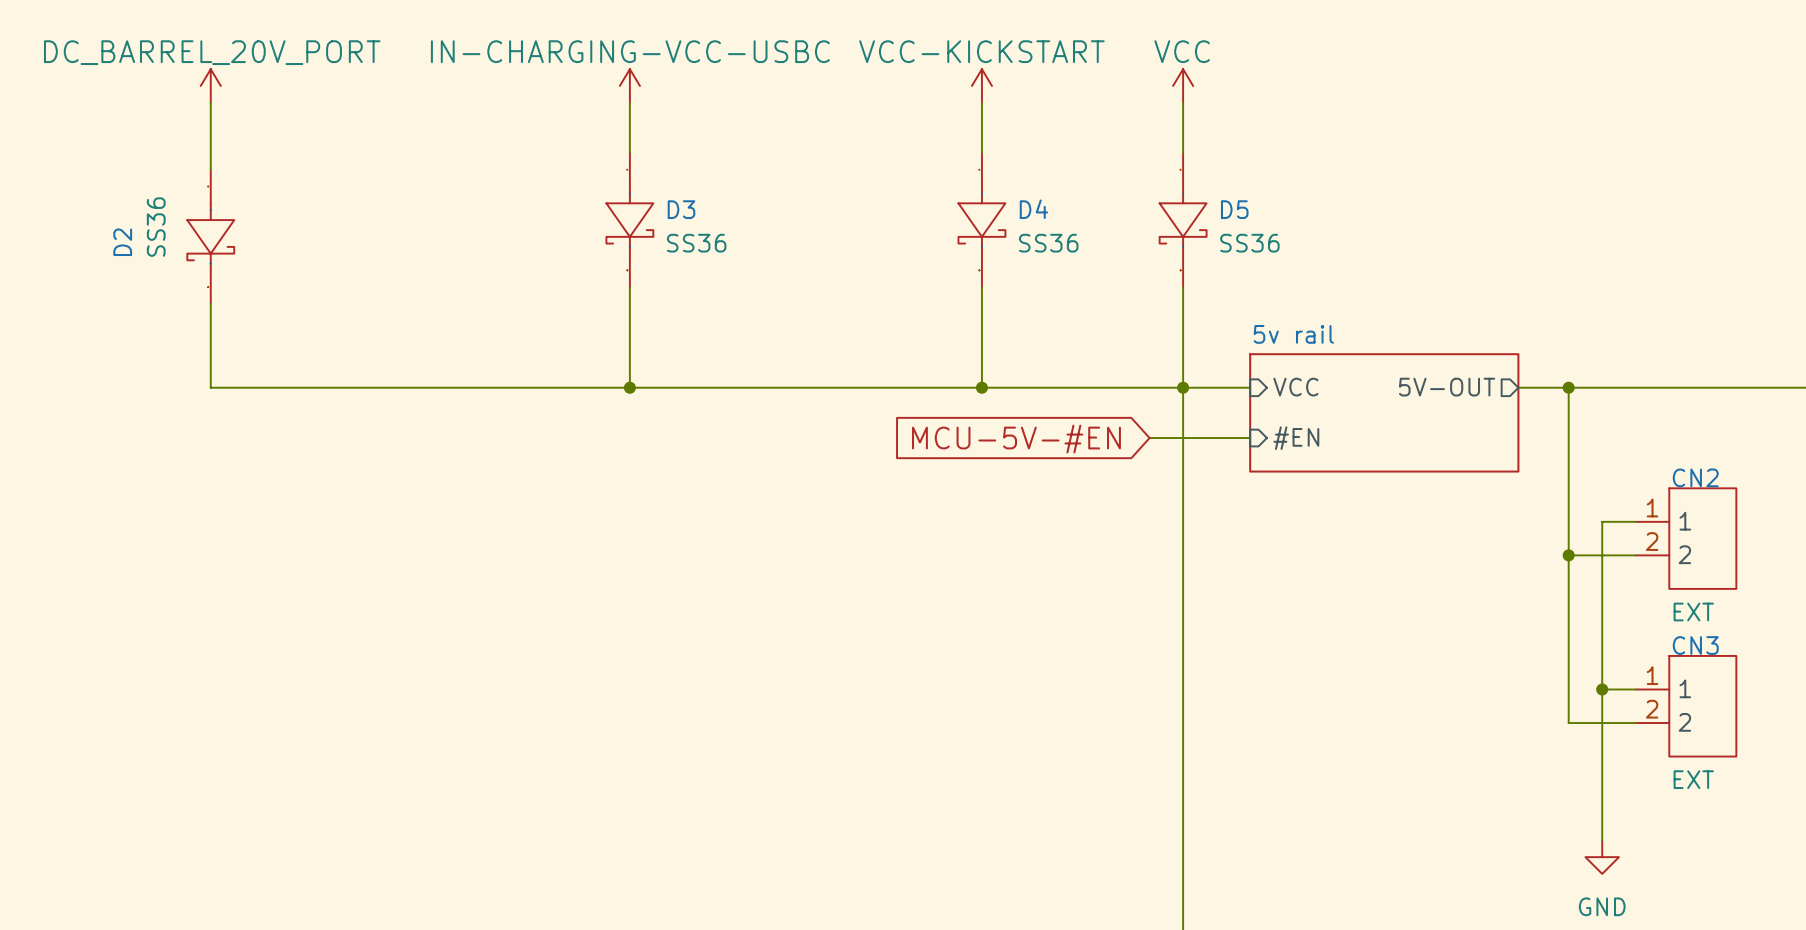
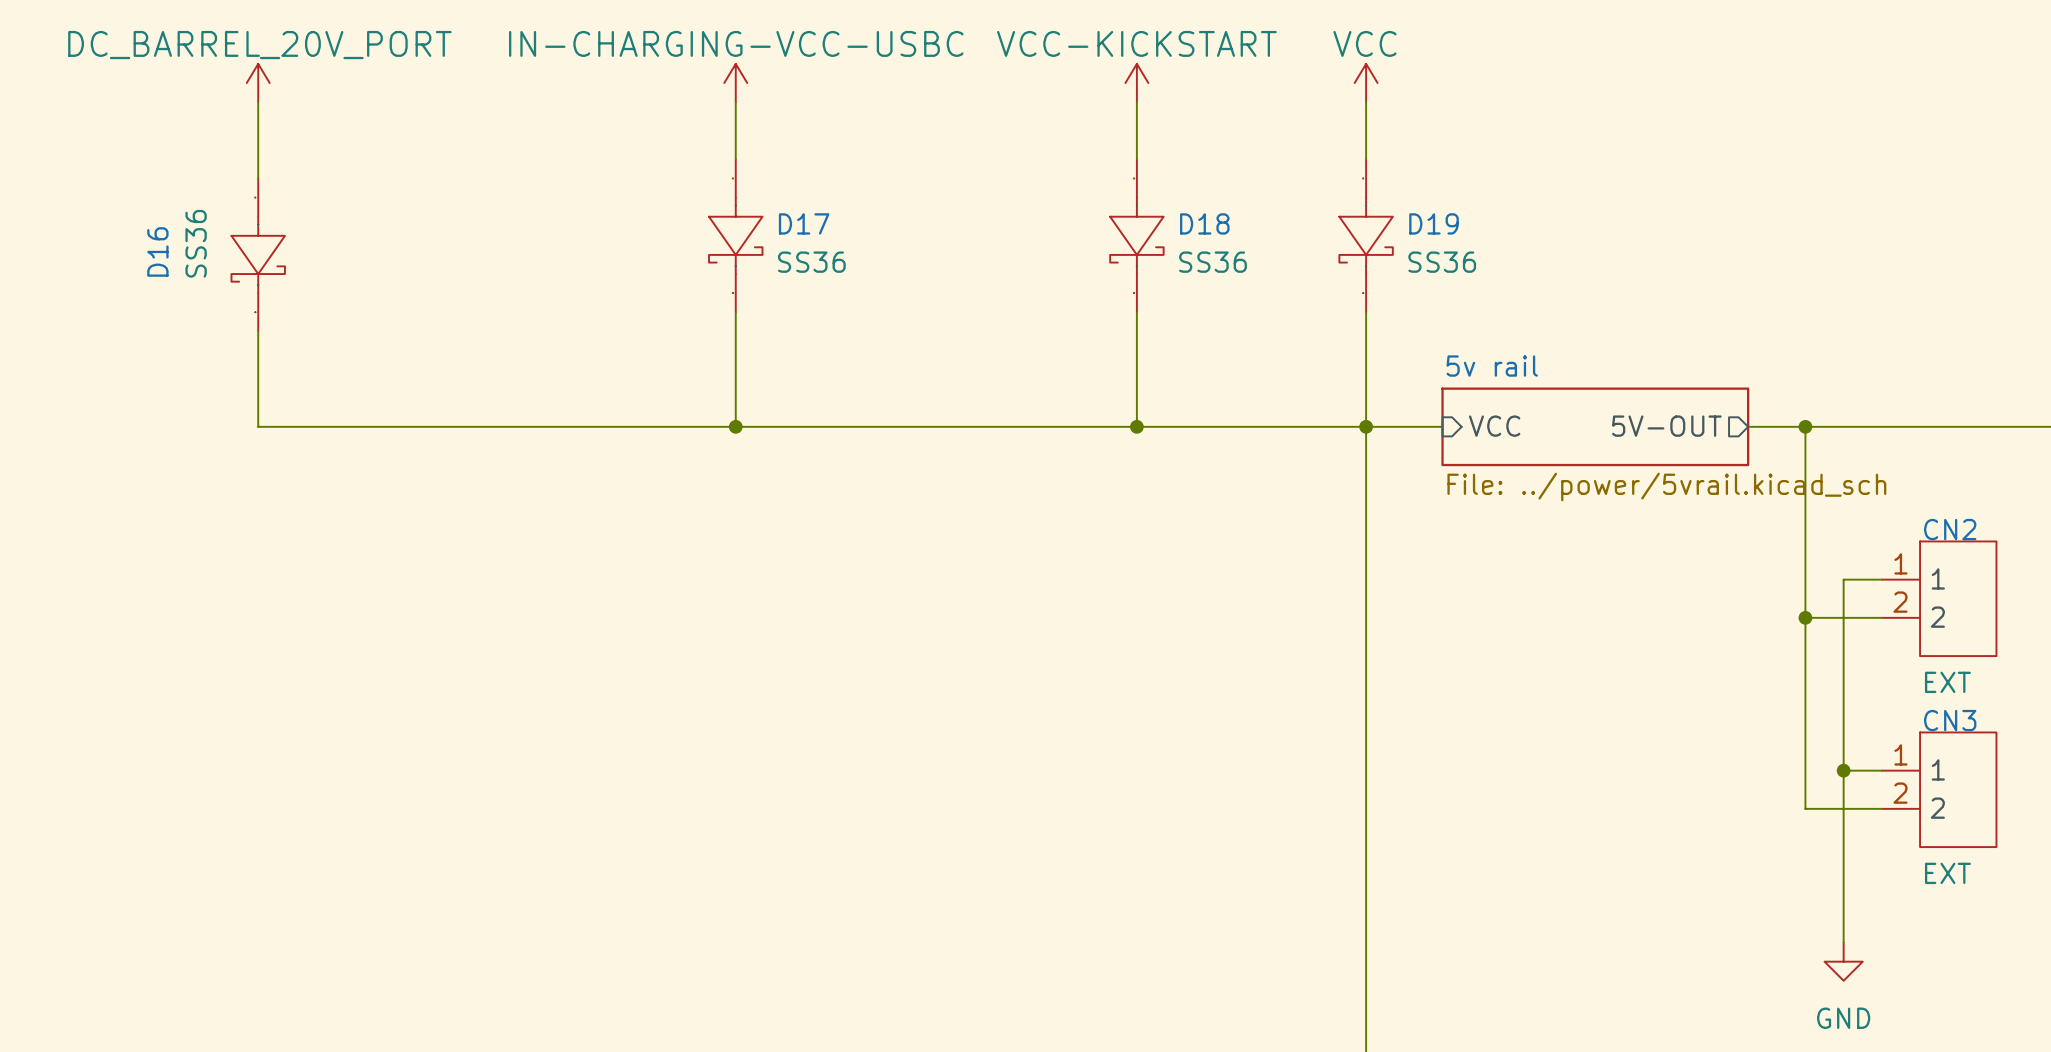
D3 name: D3 (681, 209) -> D17 (804, 223)
D4 name: D4 (1033, 209) -> D18 (1204, 223)
D5 name: D5 (1234, 209) -> D19 (1434, 223)
D2 name: D2 (122, 242) -> D16 (157, 251)
sheet 5v rail shape: [1249, 353, 1520, 473] -> [1441, 387, 1750, 467]
wire: (1149, 438) (1250, 438) -> none
sheet pin: #EN (1296, 438) -> none
global label: MCU-5V-#EN (1016, 439) -> none
sheet 5v rail value: none -> File: ../power/5vrail.kicad_sch (1666, 487)

